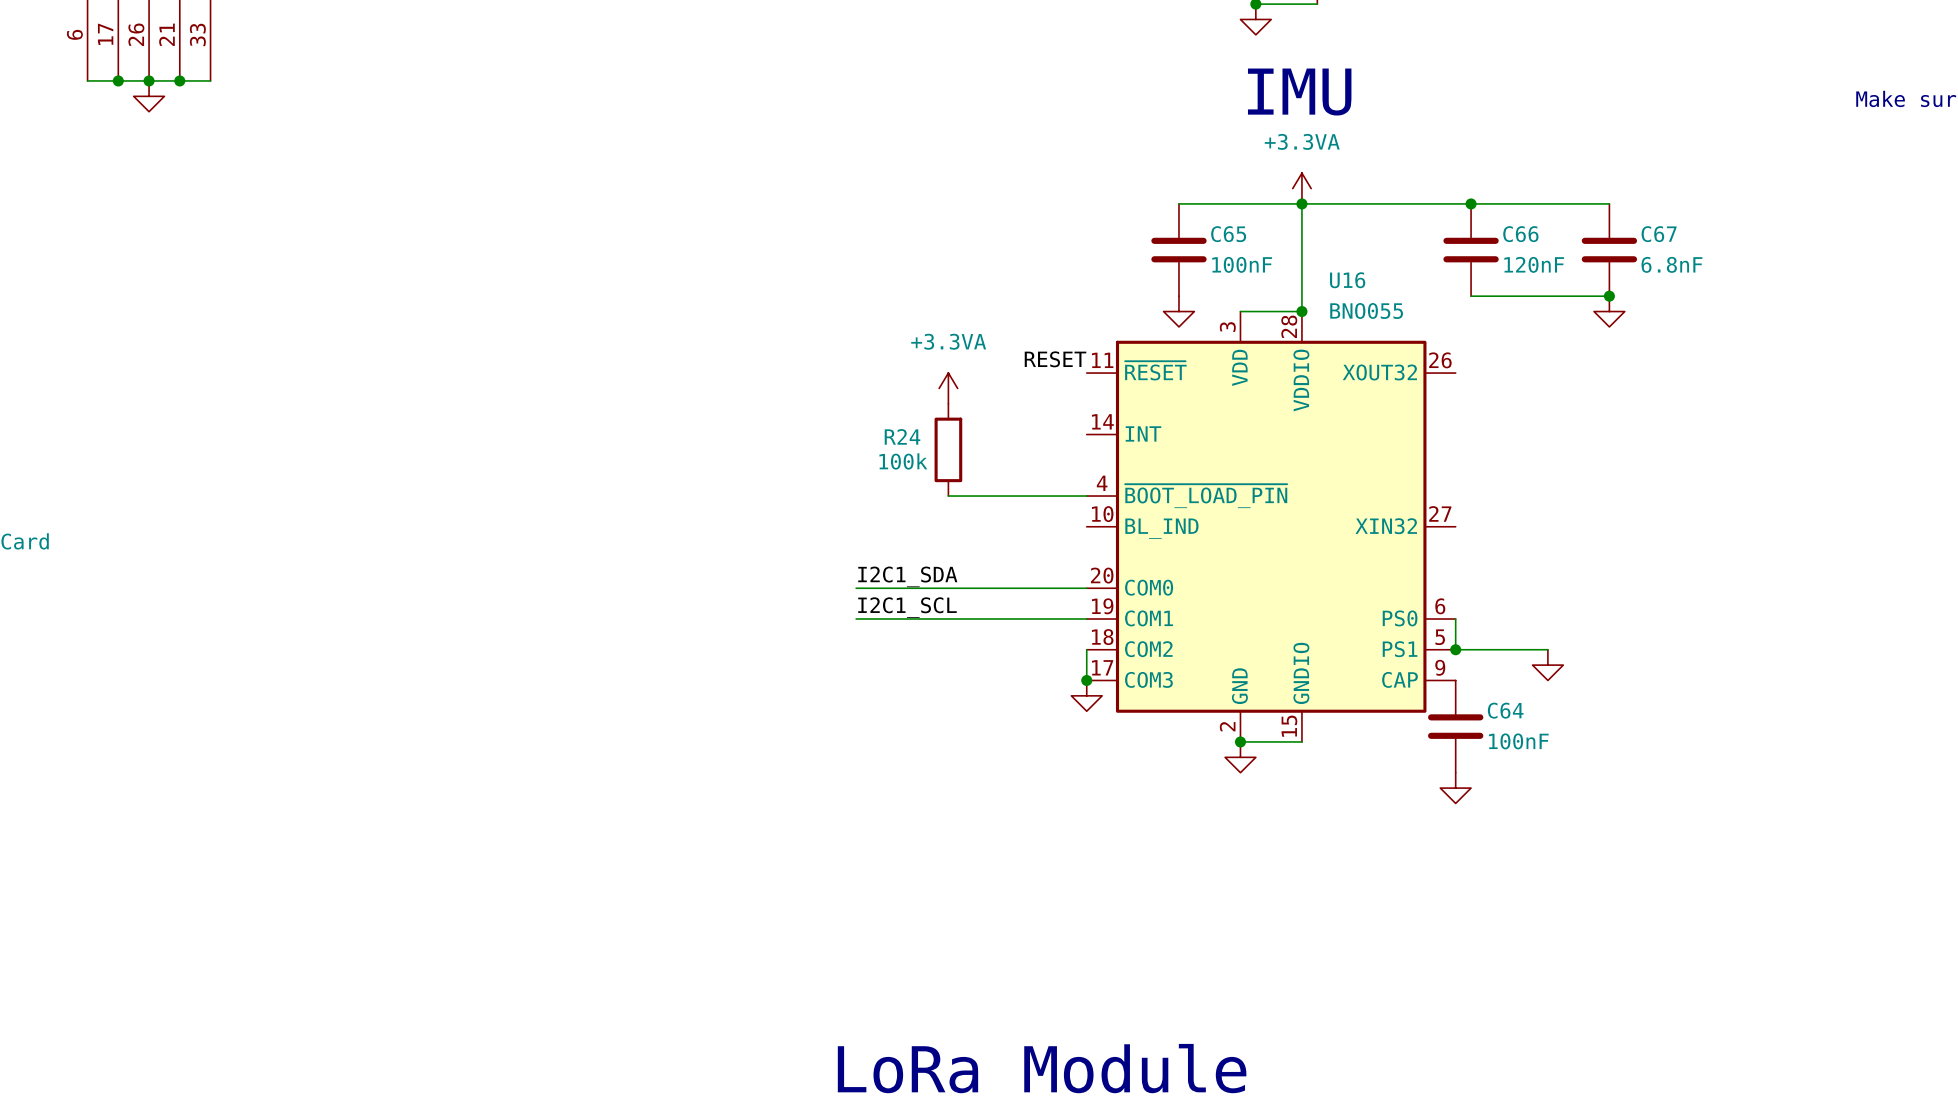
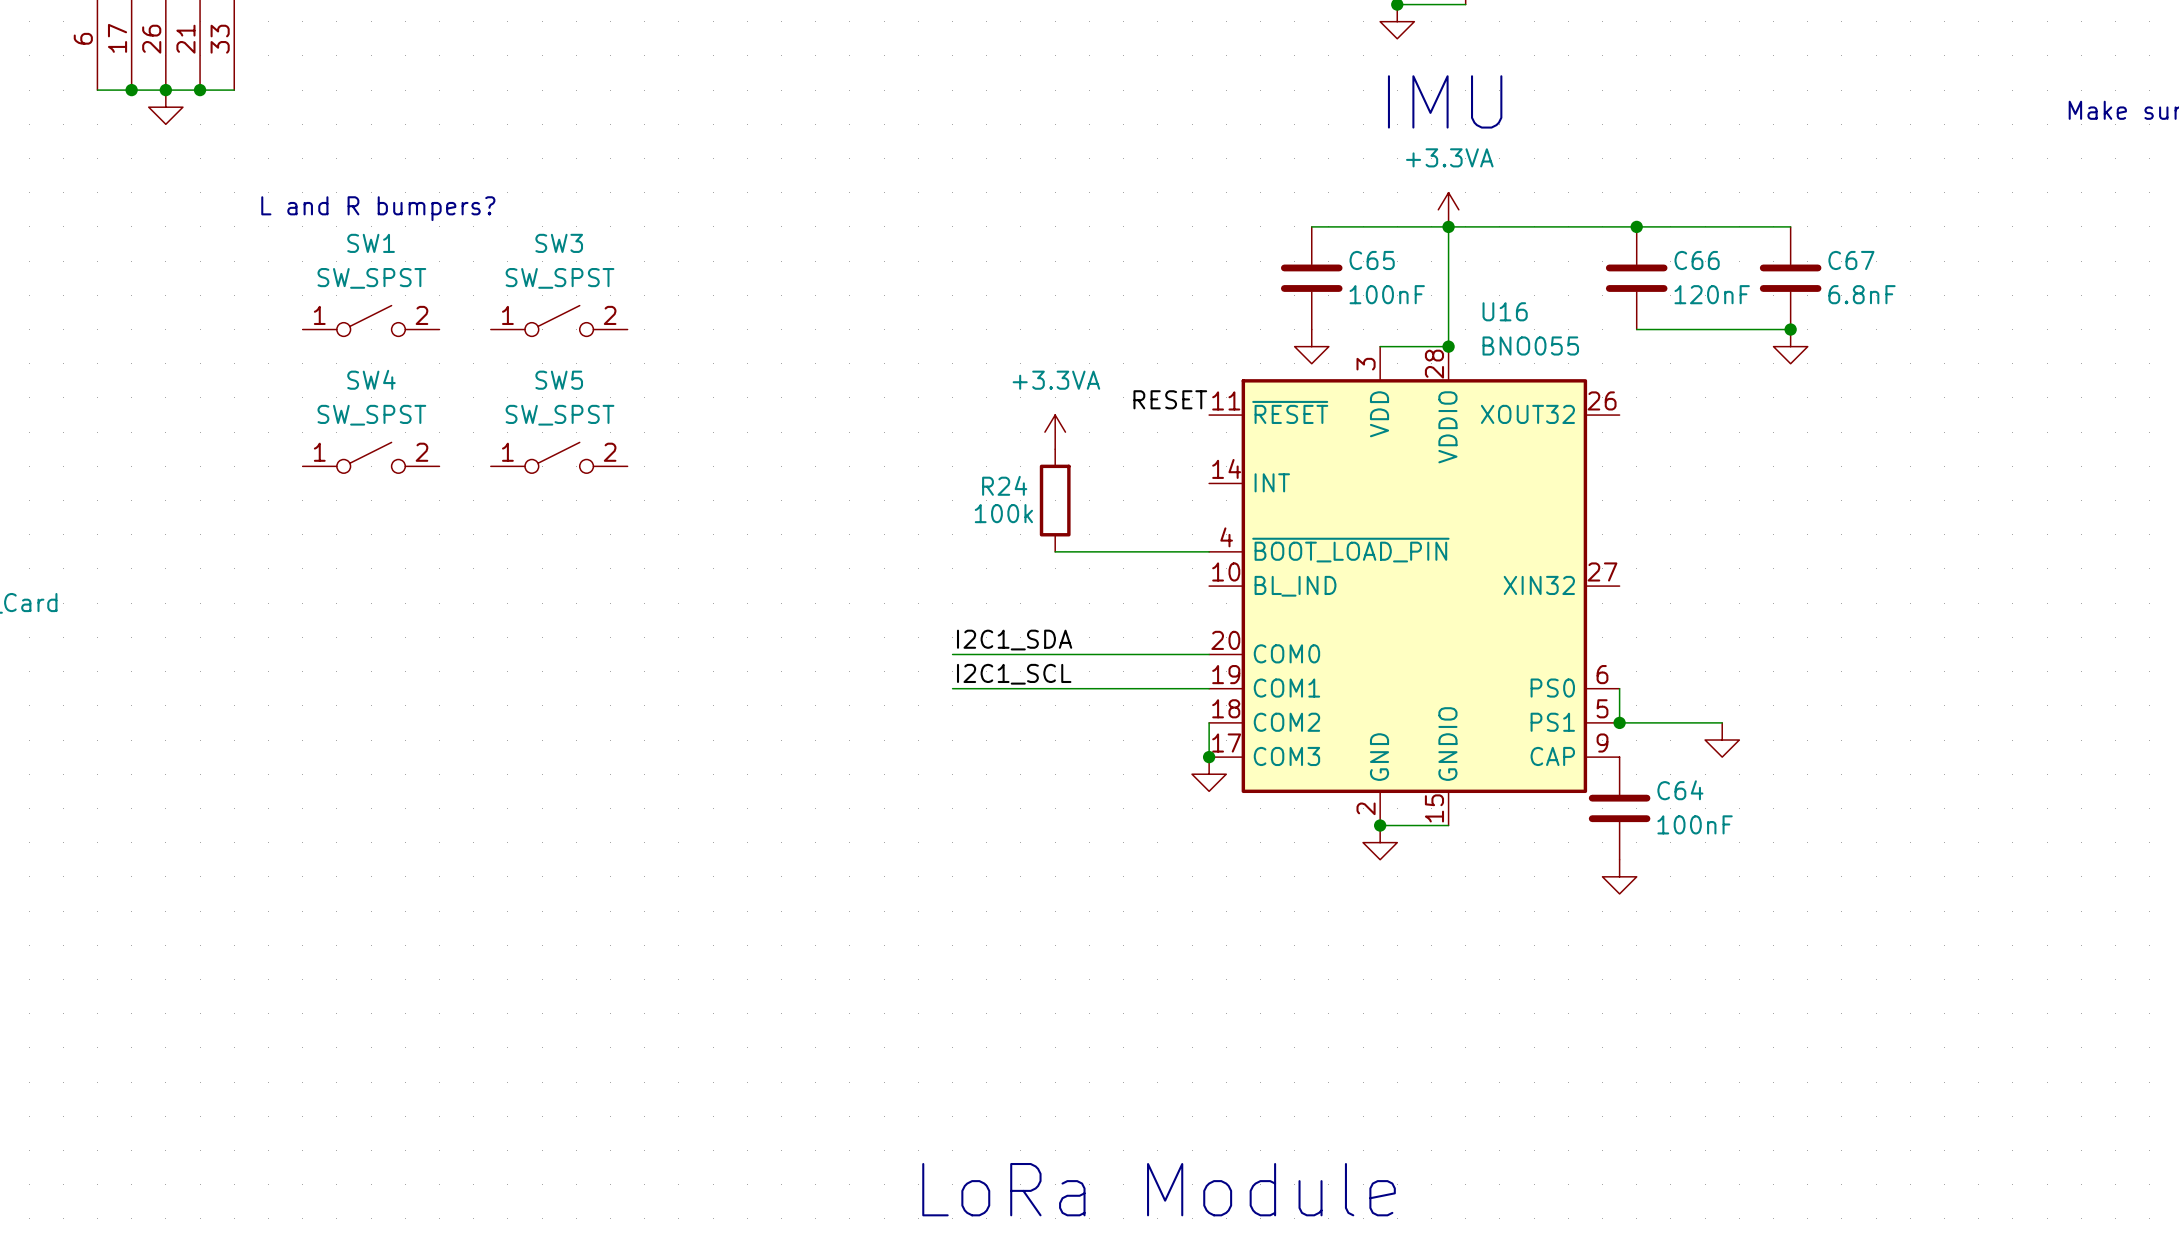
text: none -> L and R bumpers? (378, 208)
SW1: none -> SW_SPST (371, 320)
SW3: none -> SW_SPST (559, 320)
SW4: none -> SW_SPST (371, 457)
SW5: none -> SW_SPST (559, 457)

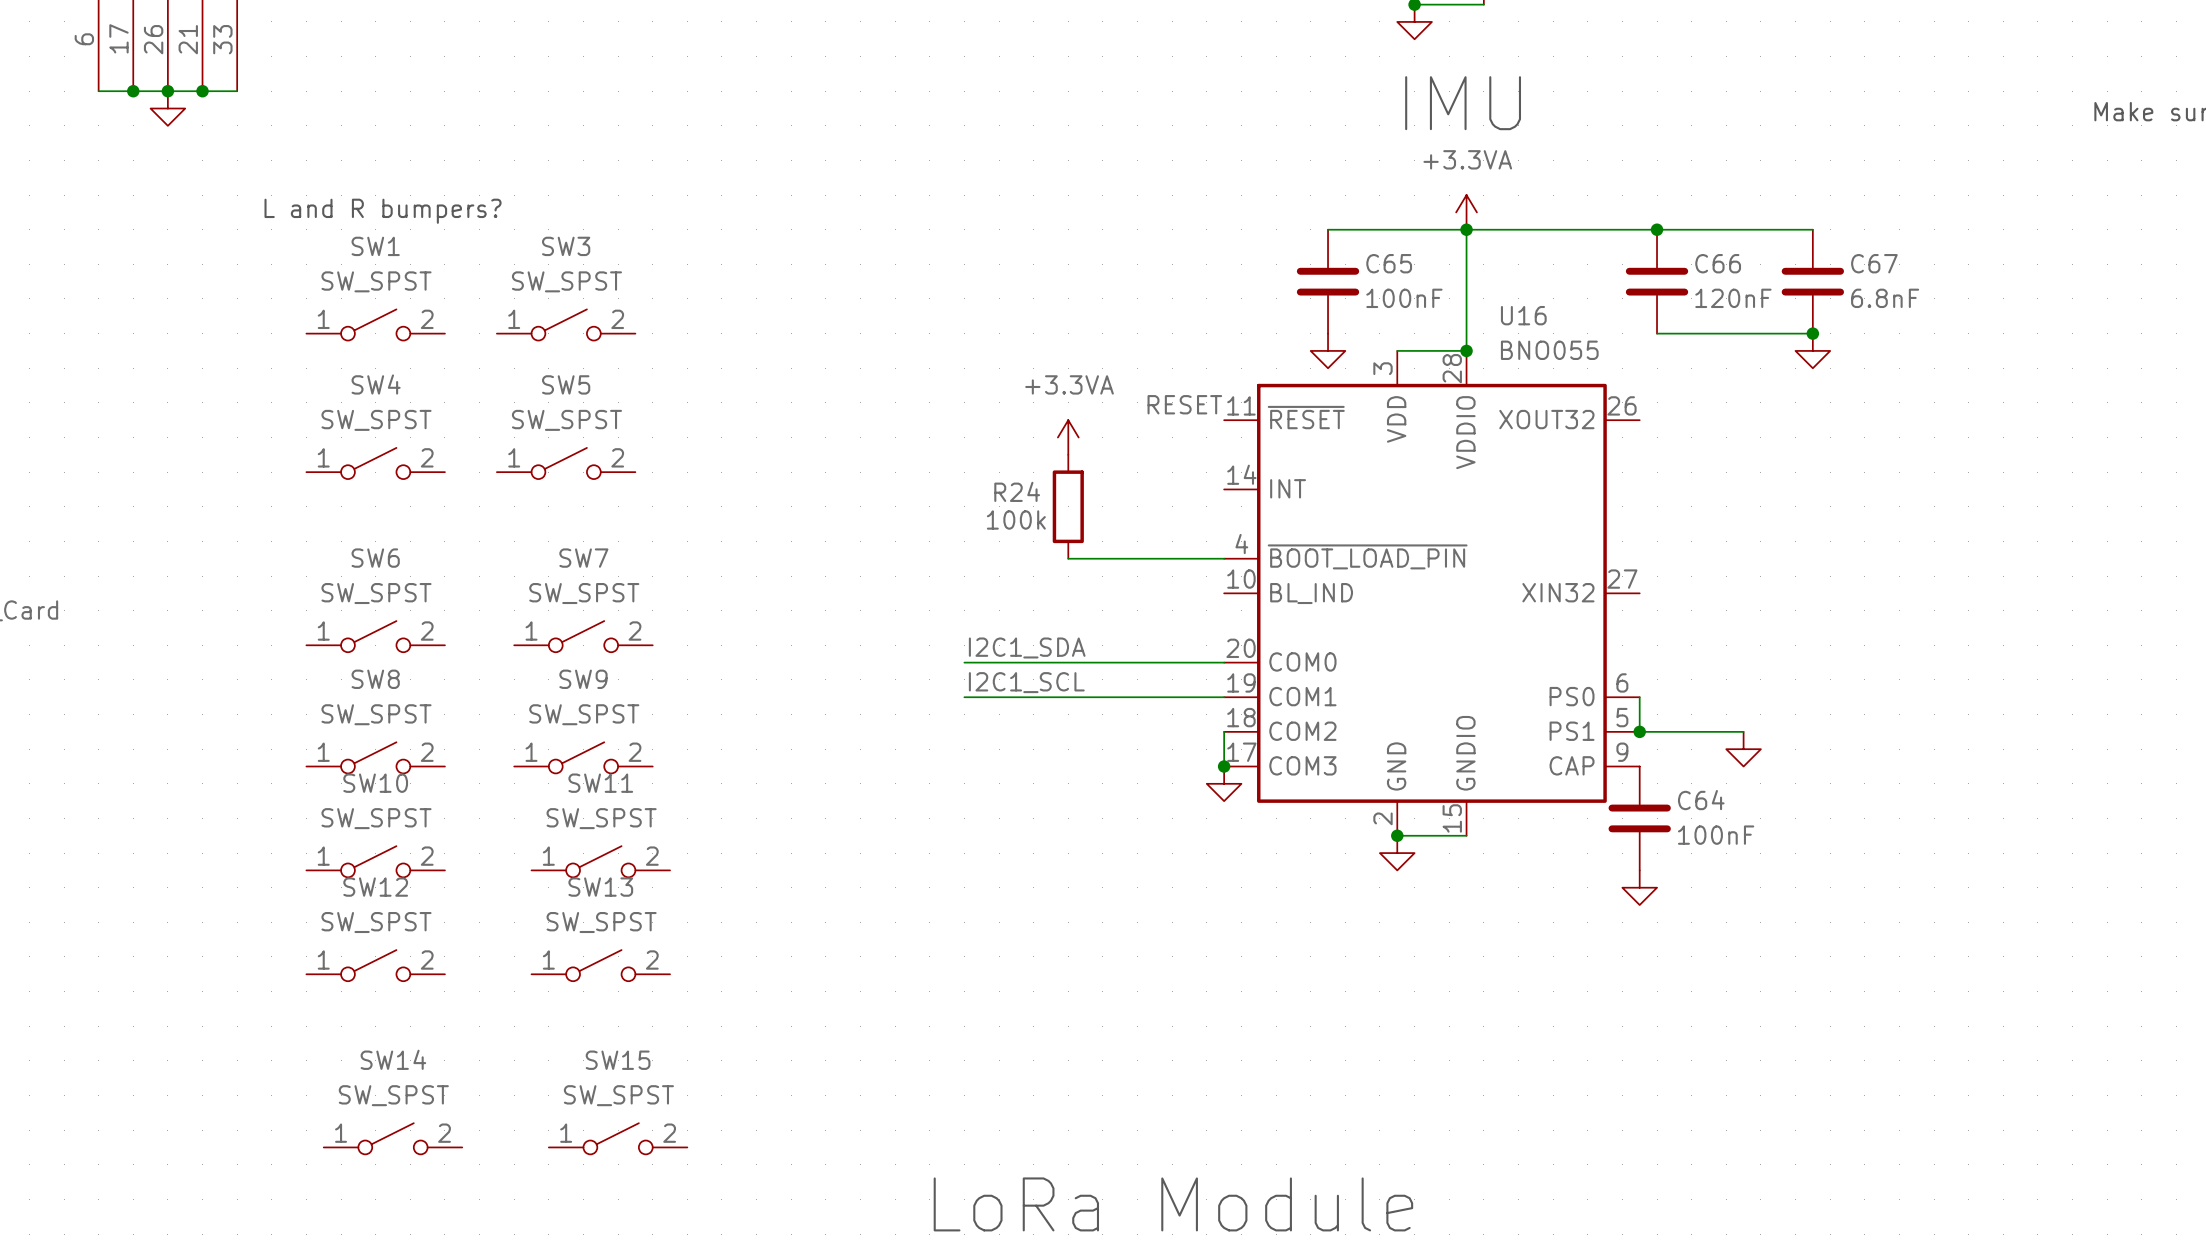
SW6: none -> SW_SPST (375, 636)
SW7: none -> SW_SPST (583, 636)
SW8: none -> SW_SPST (375, 757)
SW9: none -> SW_SPST (583, 757)
SW10: none -> SW_SPST (375, 861)
SW11: none -> SW_SPST (600, 861)
SW12: none -> SW_SPST (375, 965)
SW13: none -> SW_SPST (600, 965)
SW14: none -> SW_SPST (392, 1138)
SW15: none -> SW_SPST (618, 1138)

